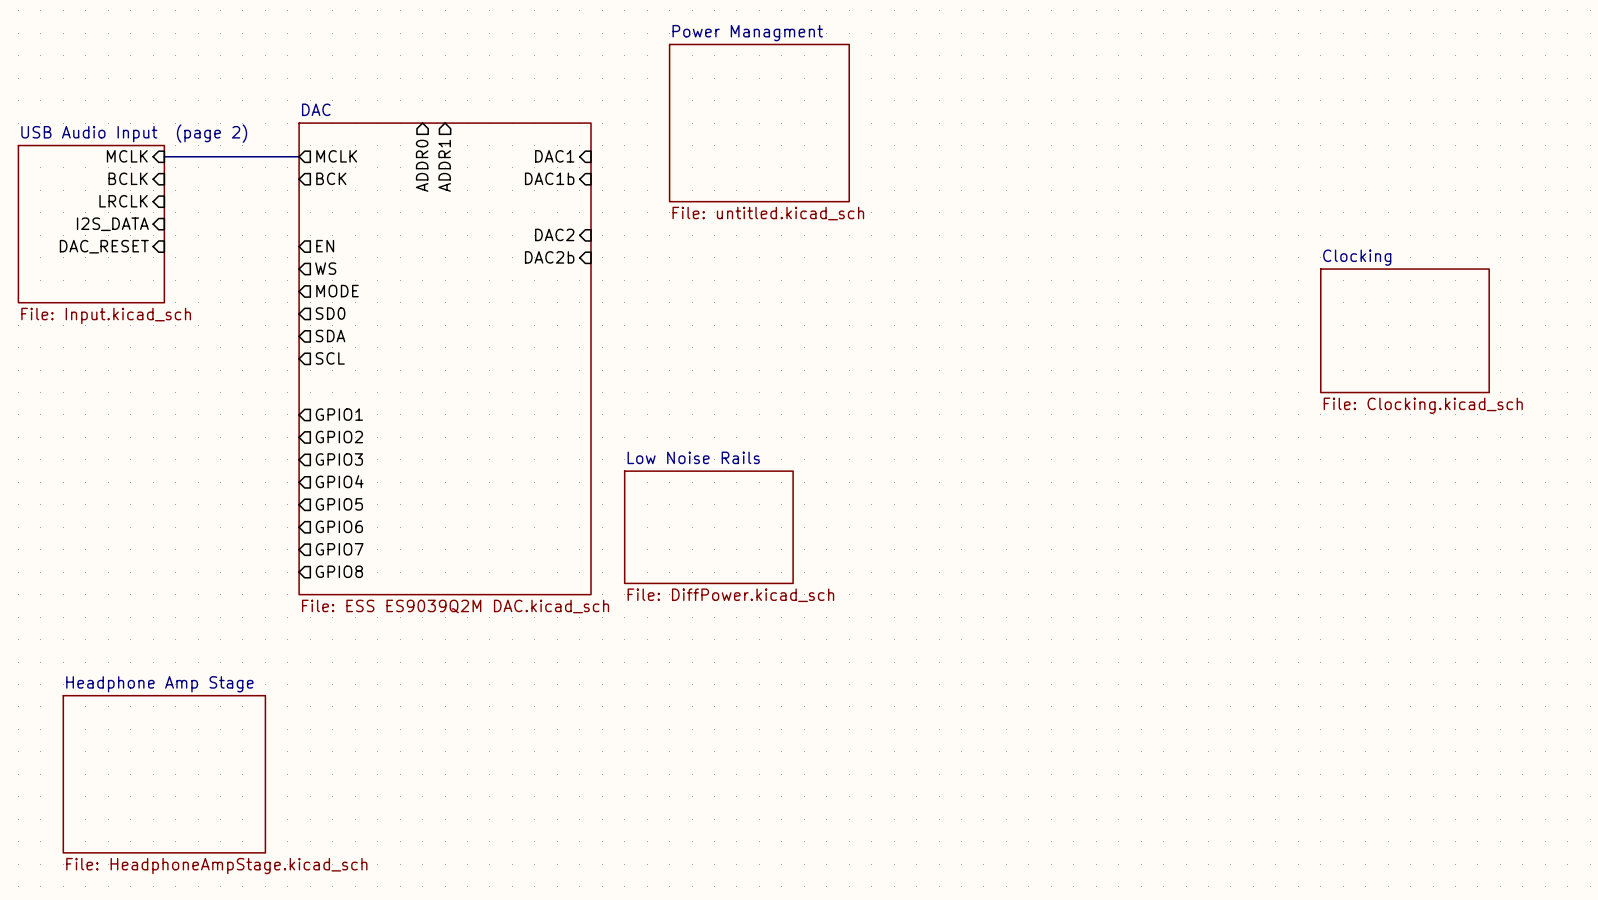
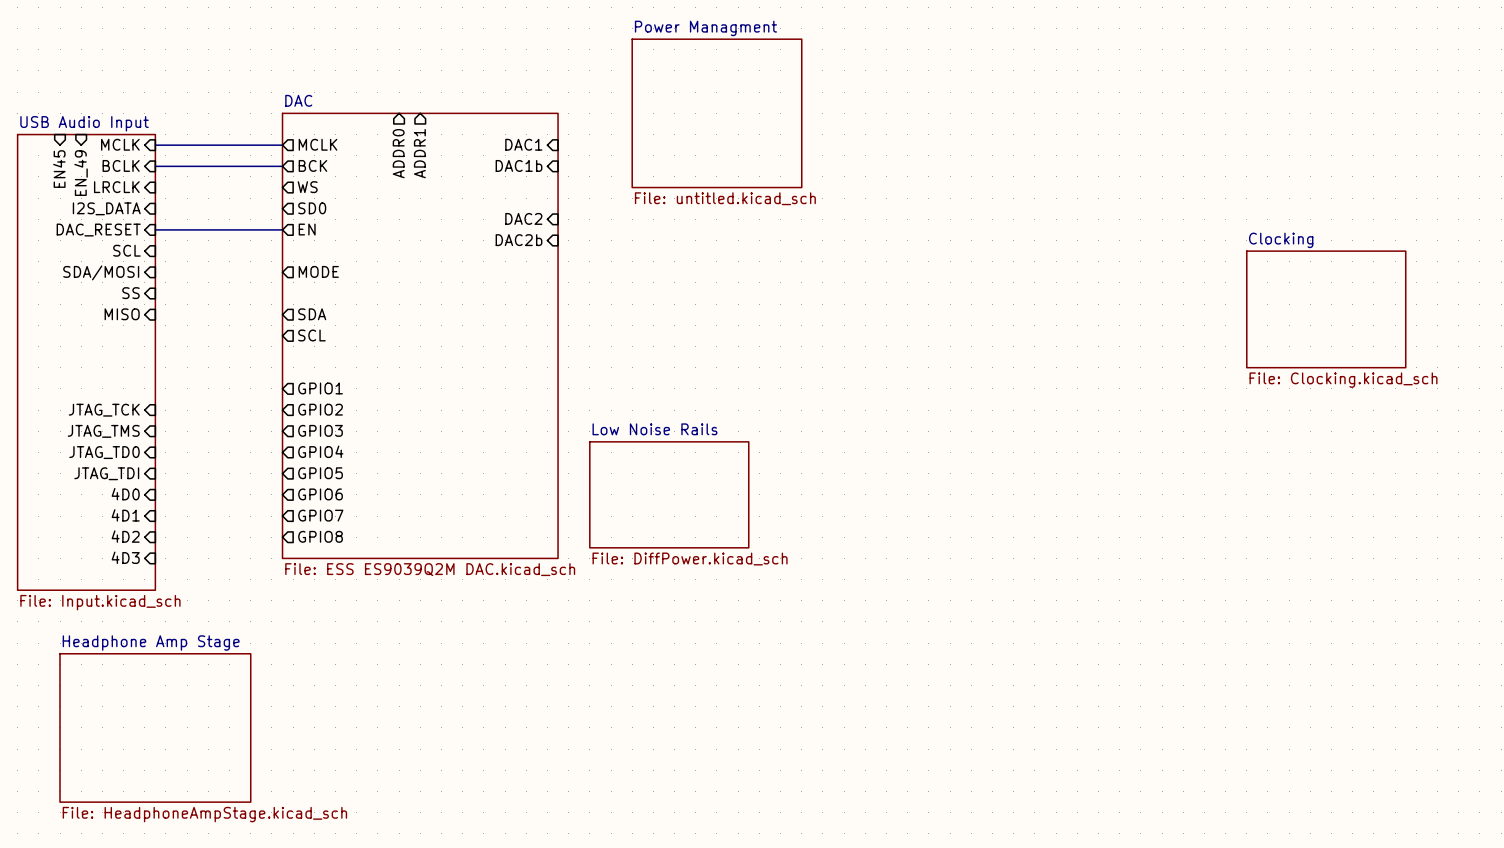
wire: none -> (155, 166) (282, 166)
sheet pin: none -> EN45 (59, 169)
sheet pin: none -> EN_49 (81, 173)
sheet USB Audio Input (page 2): File: Input.kicad_sch (91, 224) -> none
wire: none -> (155, 229) (282, 229)
sheet pin: none -> SCL (126, 250)
sheet pin position: WS (325, 268) -> WS (307, 187)
sheet pin: none -> SDA/MOSI (101, 272)
sheet pin: none -> SS (130, 293)
sheet pin position: SD0 (330, 313) -> SD0 (312, 208)
sheet pin: none -> MISO (122, 314)
sheet USB Audio Input: none -> File: Input.kicad_sch (86, 362)
sheet pin: none -> JTAG_TCK (104, 410)
sheet pin: none -> JTAG_TMS (103, 431)
sheet pin: none -> JTAG_TD0 (104, 452)
sheet pin: none -> JTAG_TDI (106, 473)
sheet pin: none -> 4D0 (125, 494)
sheet pin: none -> 4D1 (125, 515)
sheet pin: none -> 4D2 (125, 536)
sheet pin: none -> 4D3 (125, 557)

